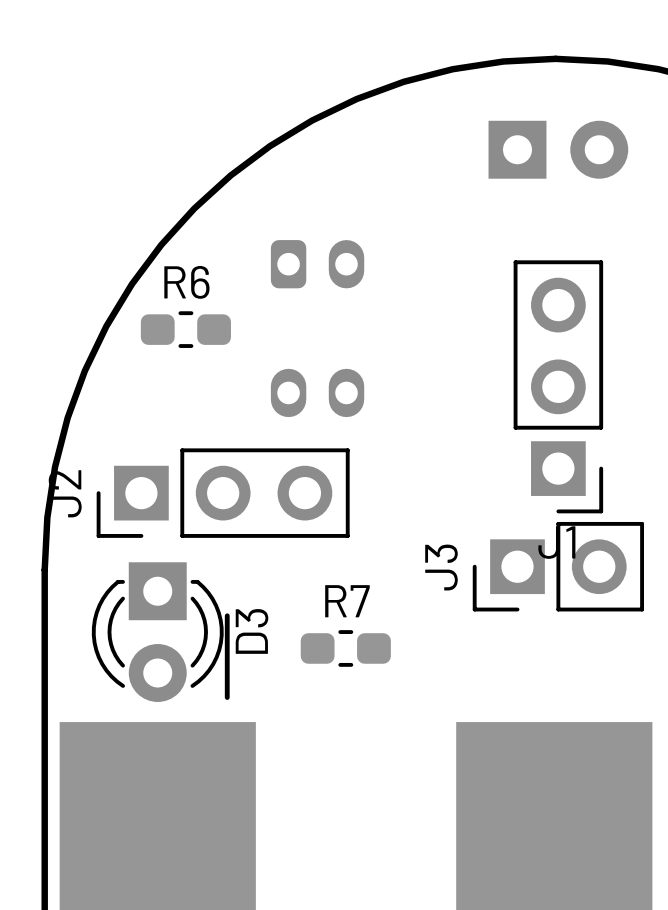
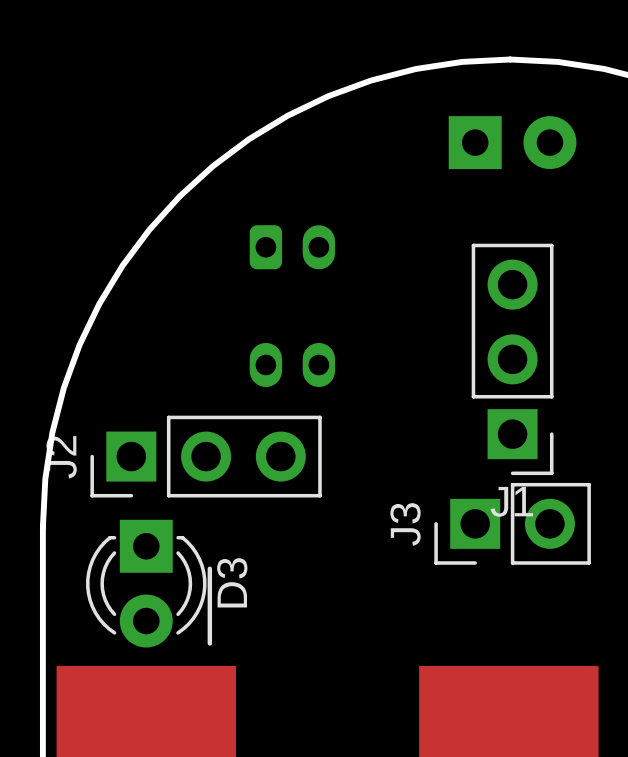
R6: (185, 329) -> none
R7: (345, 648) -> none

